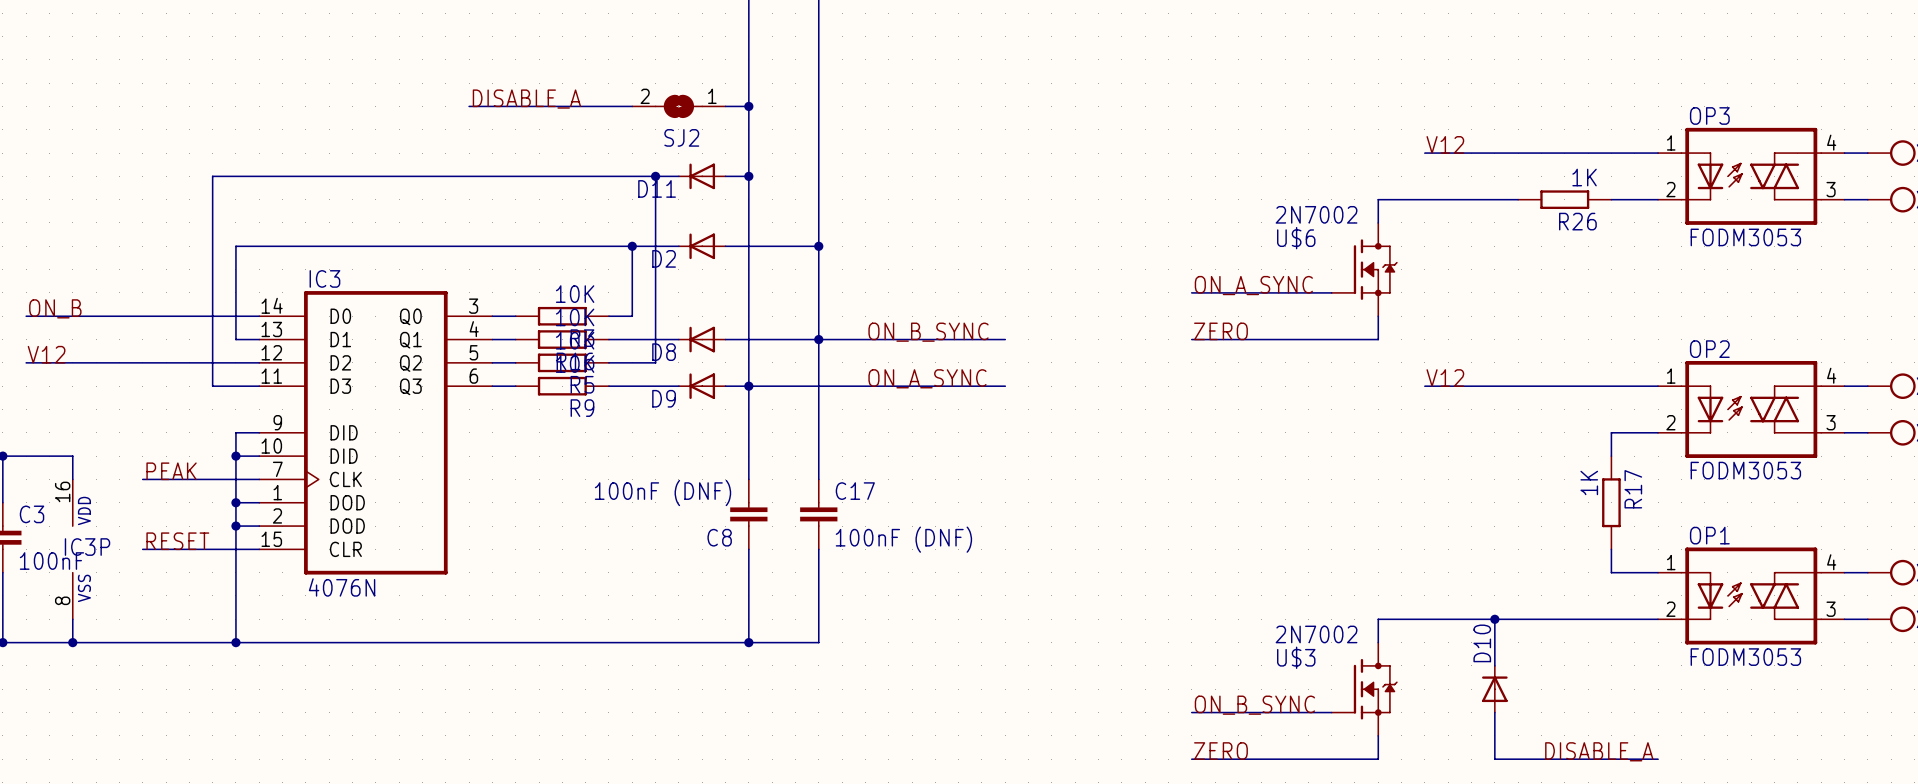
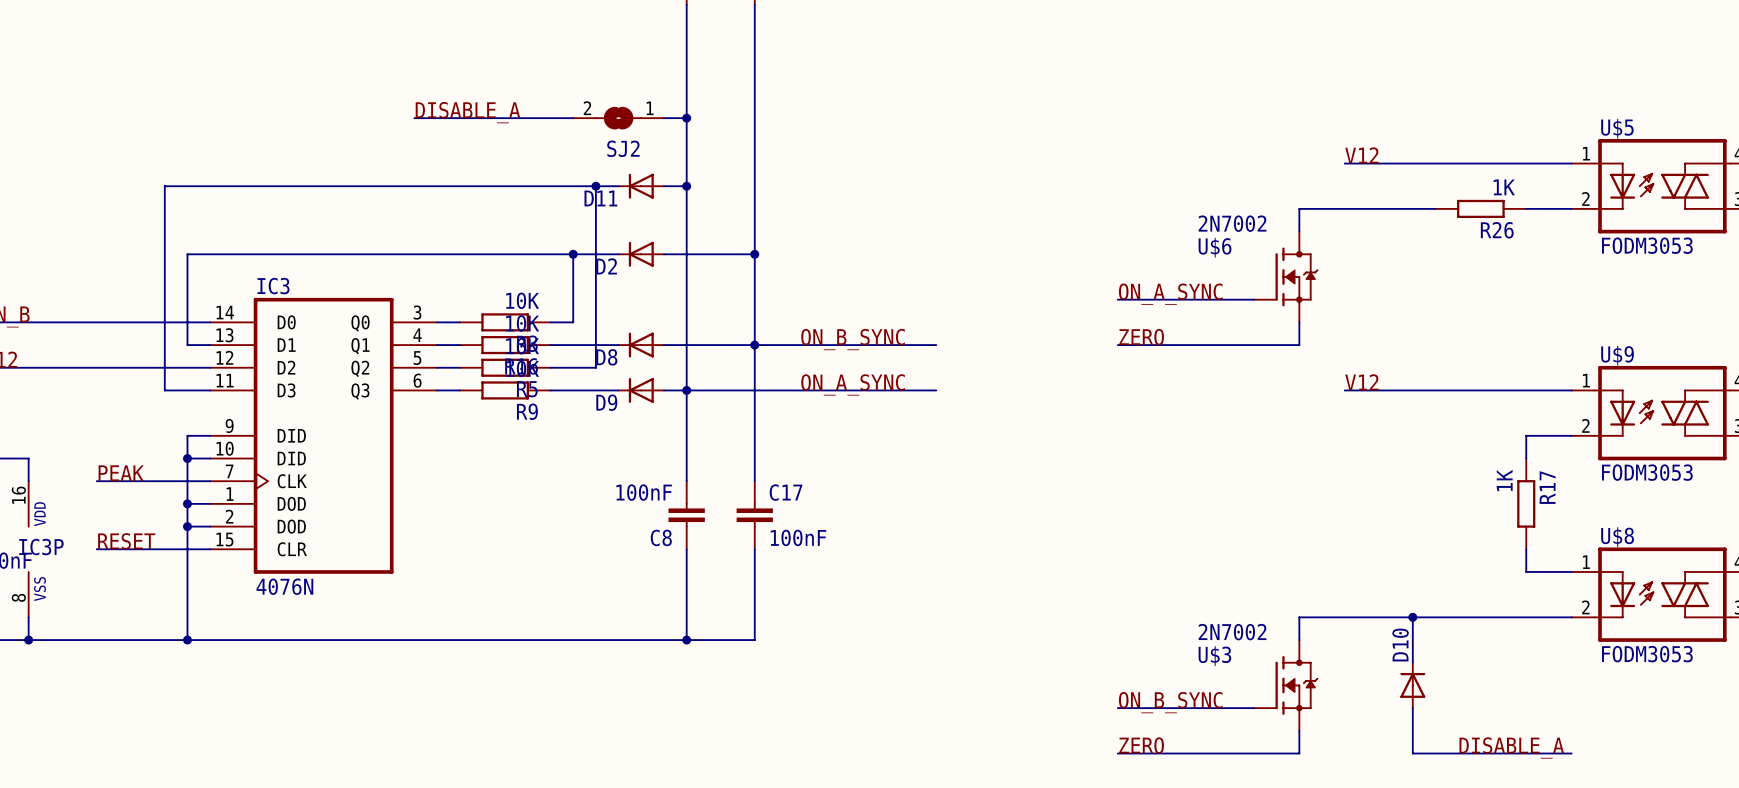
OP3 name: OP3 (1709, 115) -> U$5 (1617, 128)
OP2 name: OP2 (1709, 349) -> U$9 (1617, 355)
C8 value: 100nF (DNF) (663, 493) -> 100nF (644, 492)
OP1 name: OP1 (1709, 535) -> U$8 (1617, 537)
C17 value: 100nF (DNF) (903, 539) -> 100nF (798, 537)

